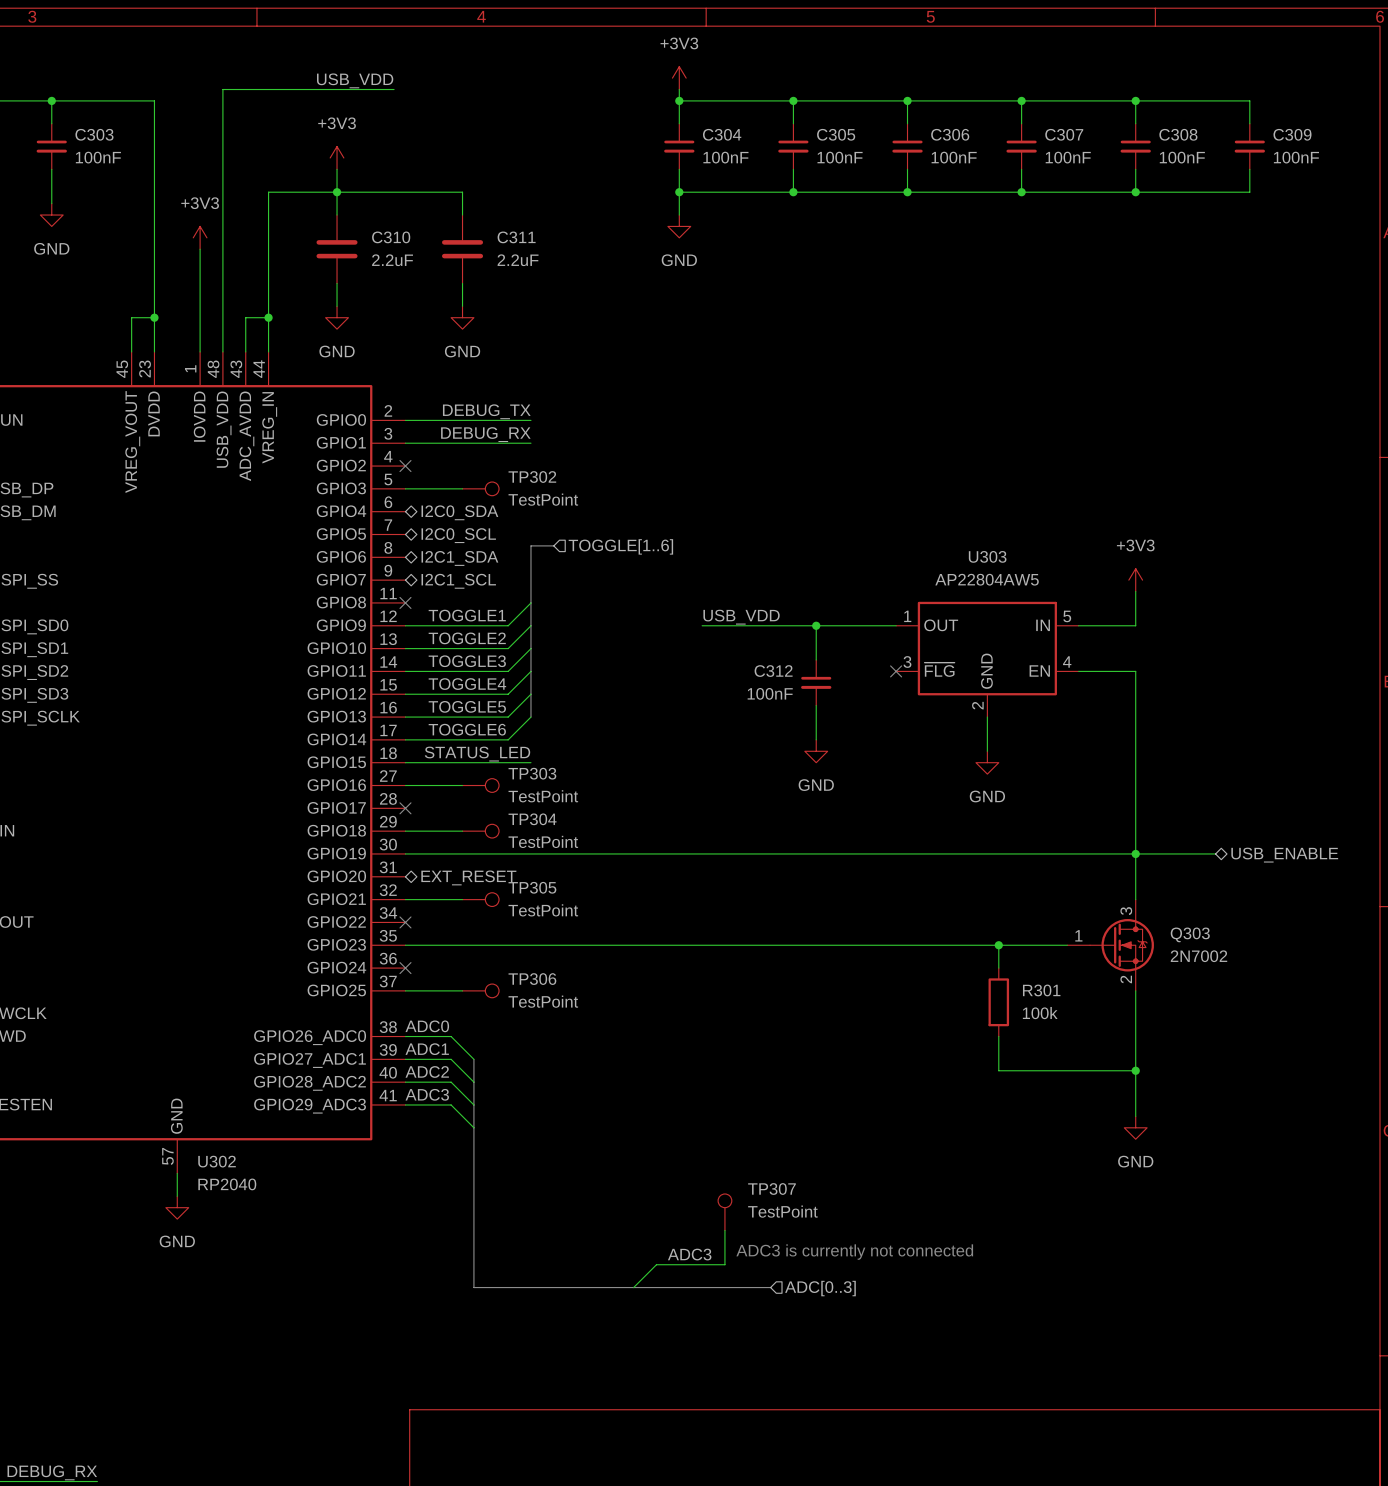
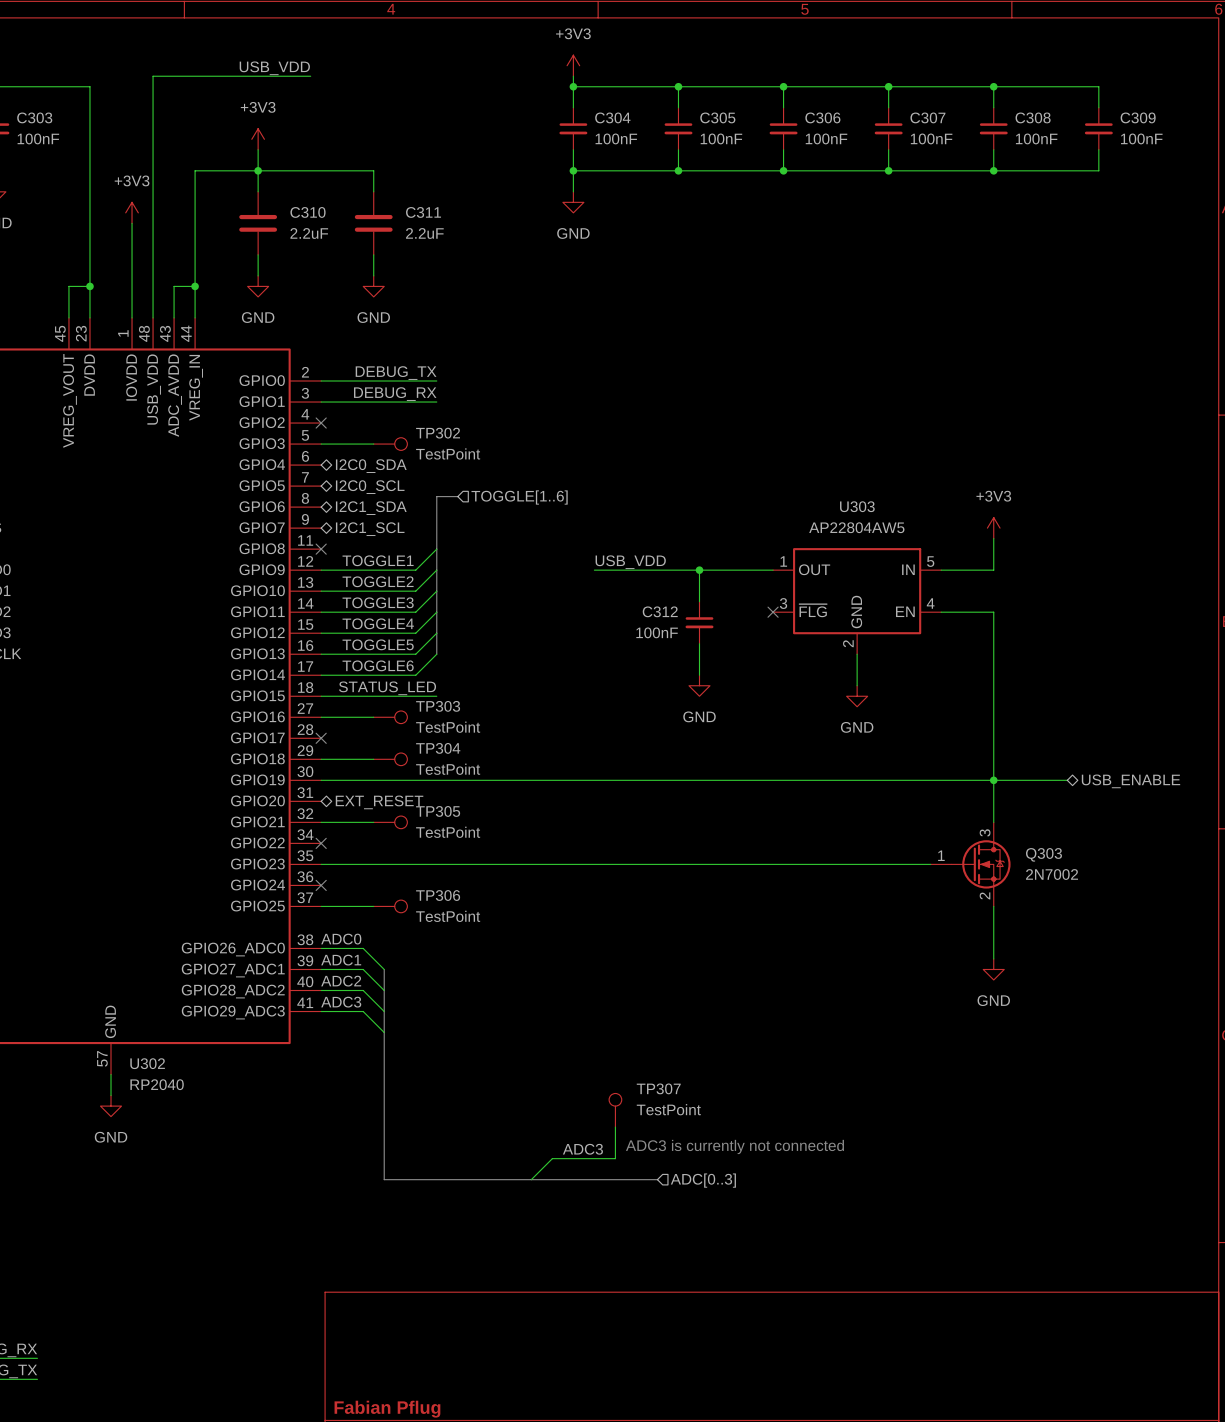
wire: (998, 945) (998, 968) -> none
junction: (998, 945) -> none
R301: 100k (998, 1002) -> none
wire: (998, 1036) (998, 1070) (1135, 1070) -> none
wire: (1135, 1047) (1135, 1116) -> none
junction: (1135, 1070) -> none
power symbol position: GND (1135, 1127) -> GND (993, 969)

